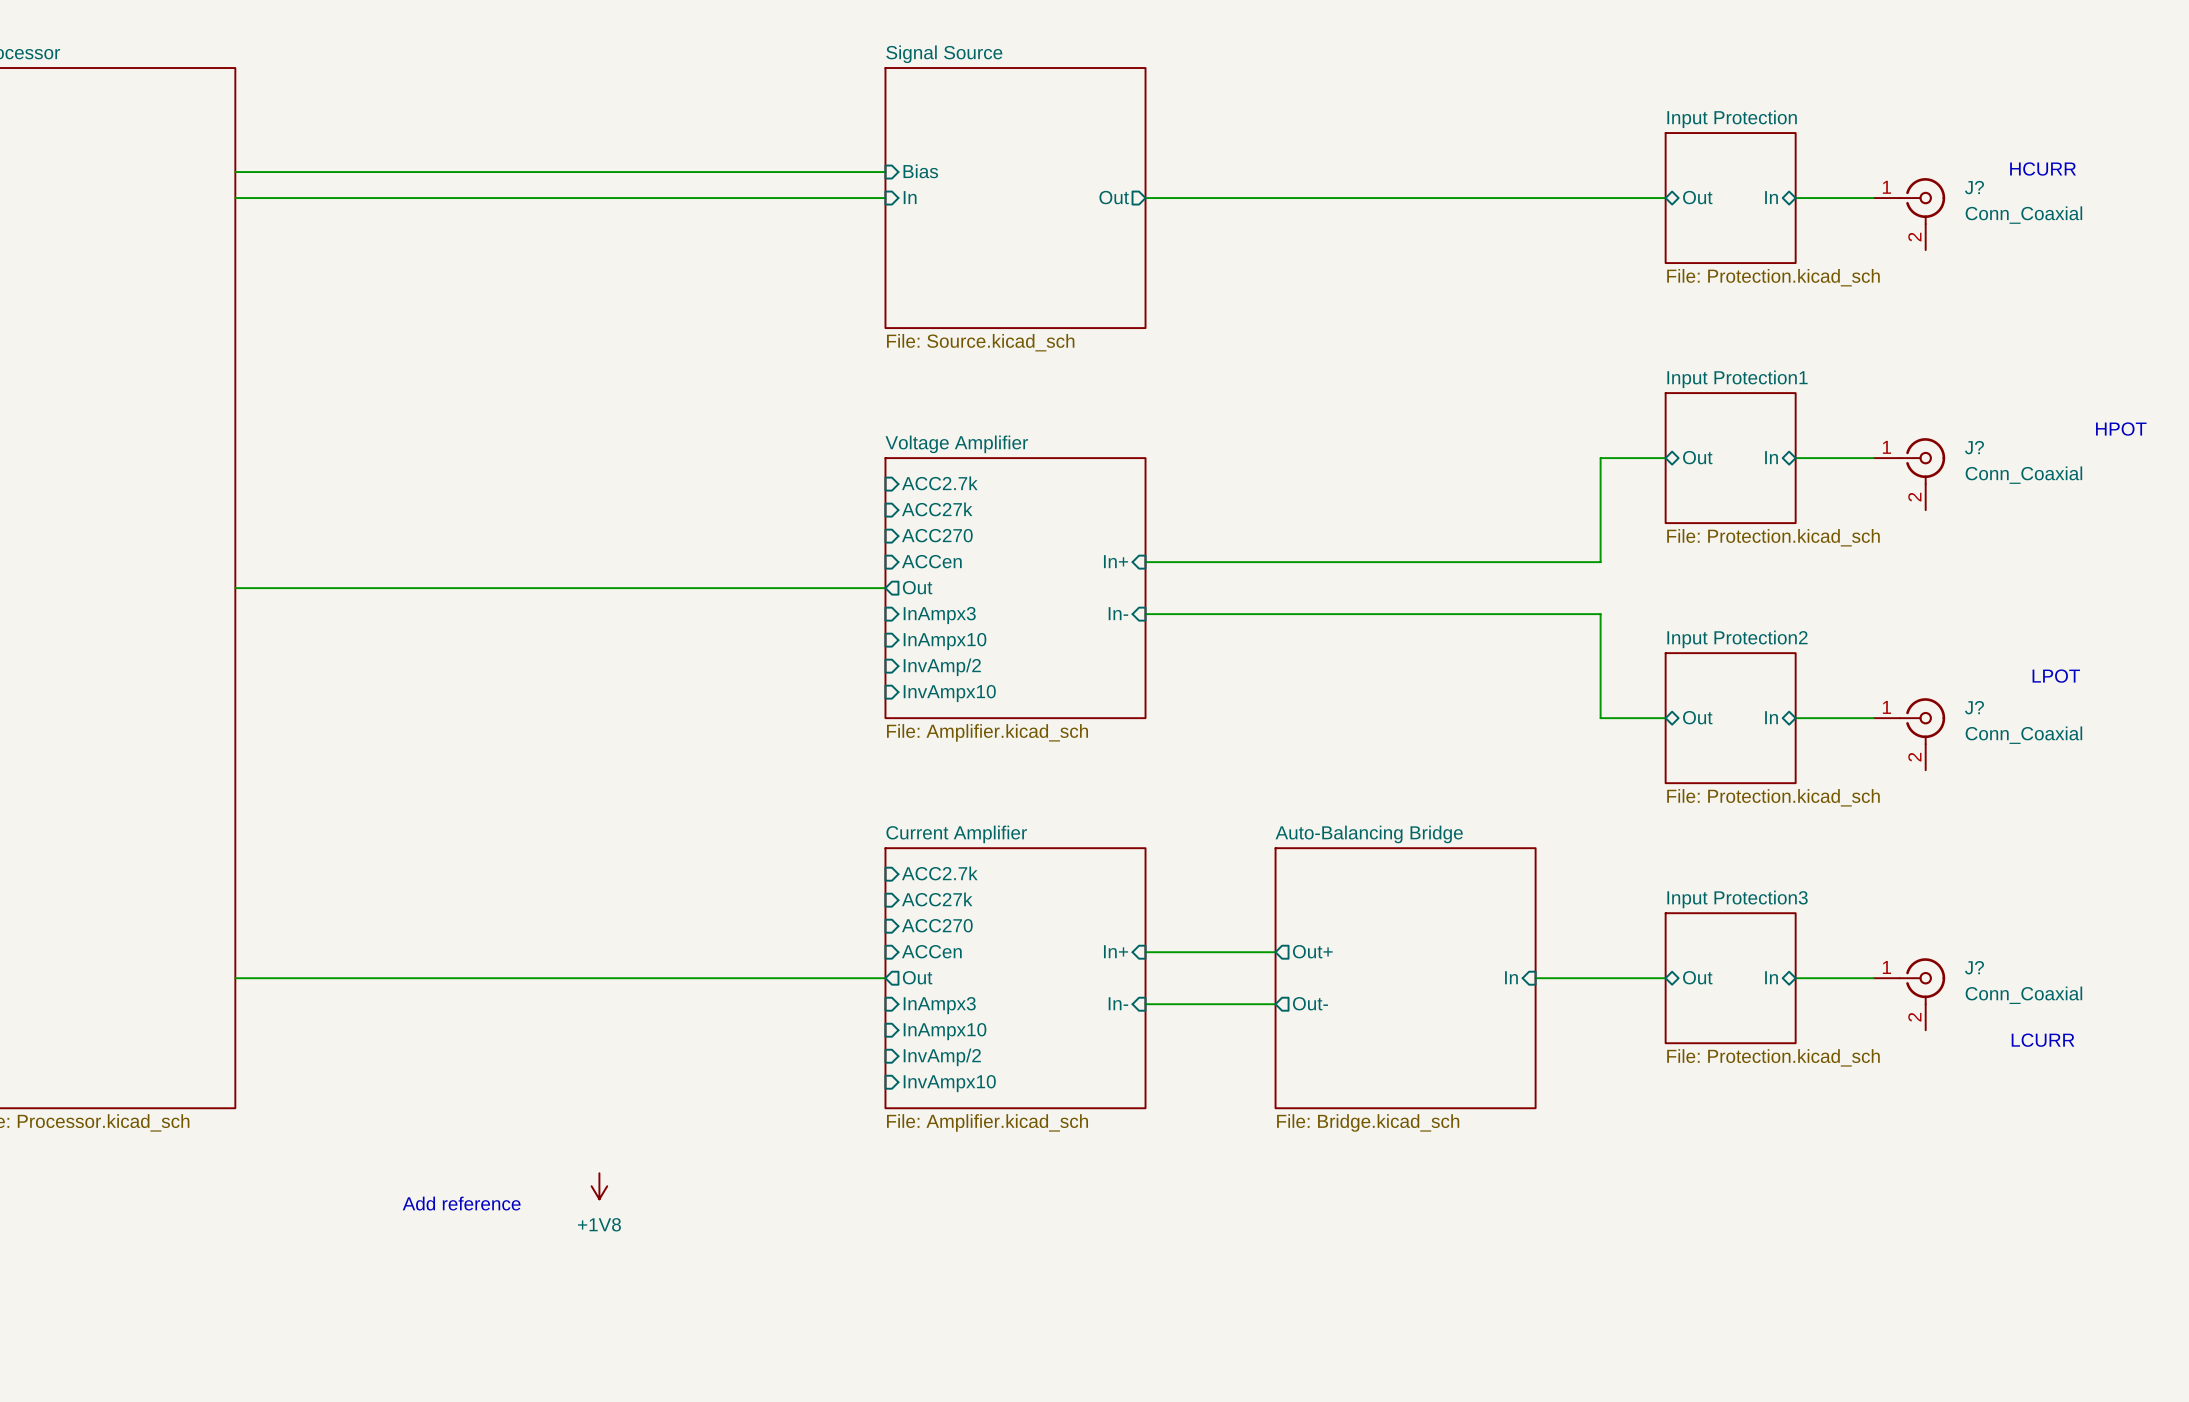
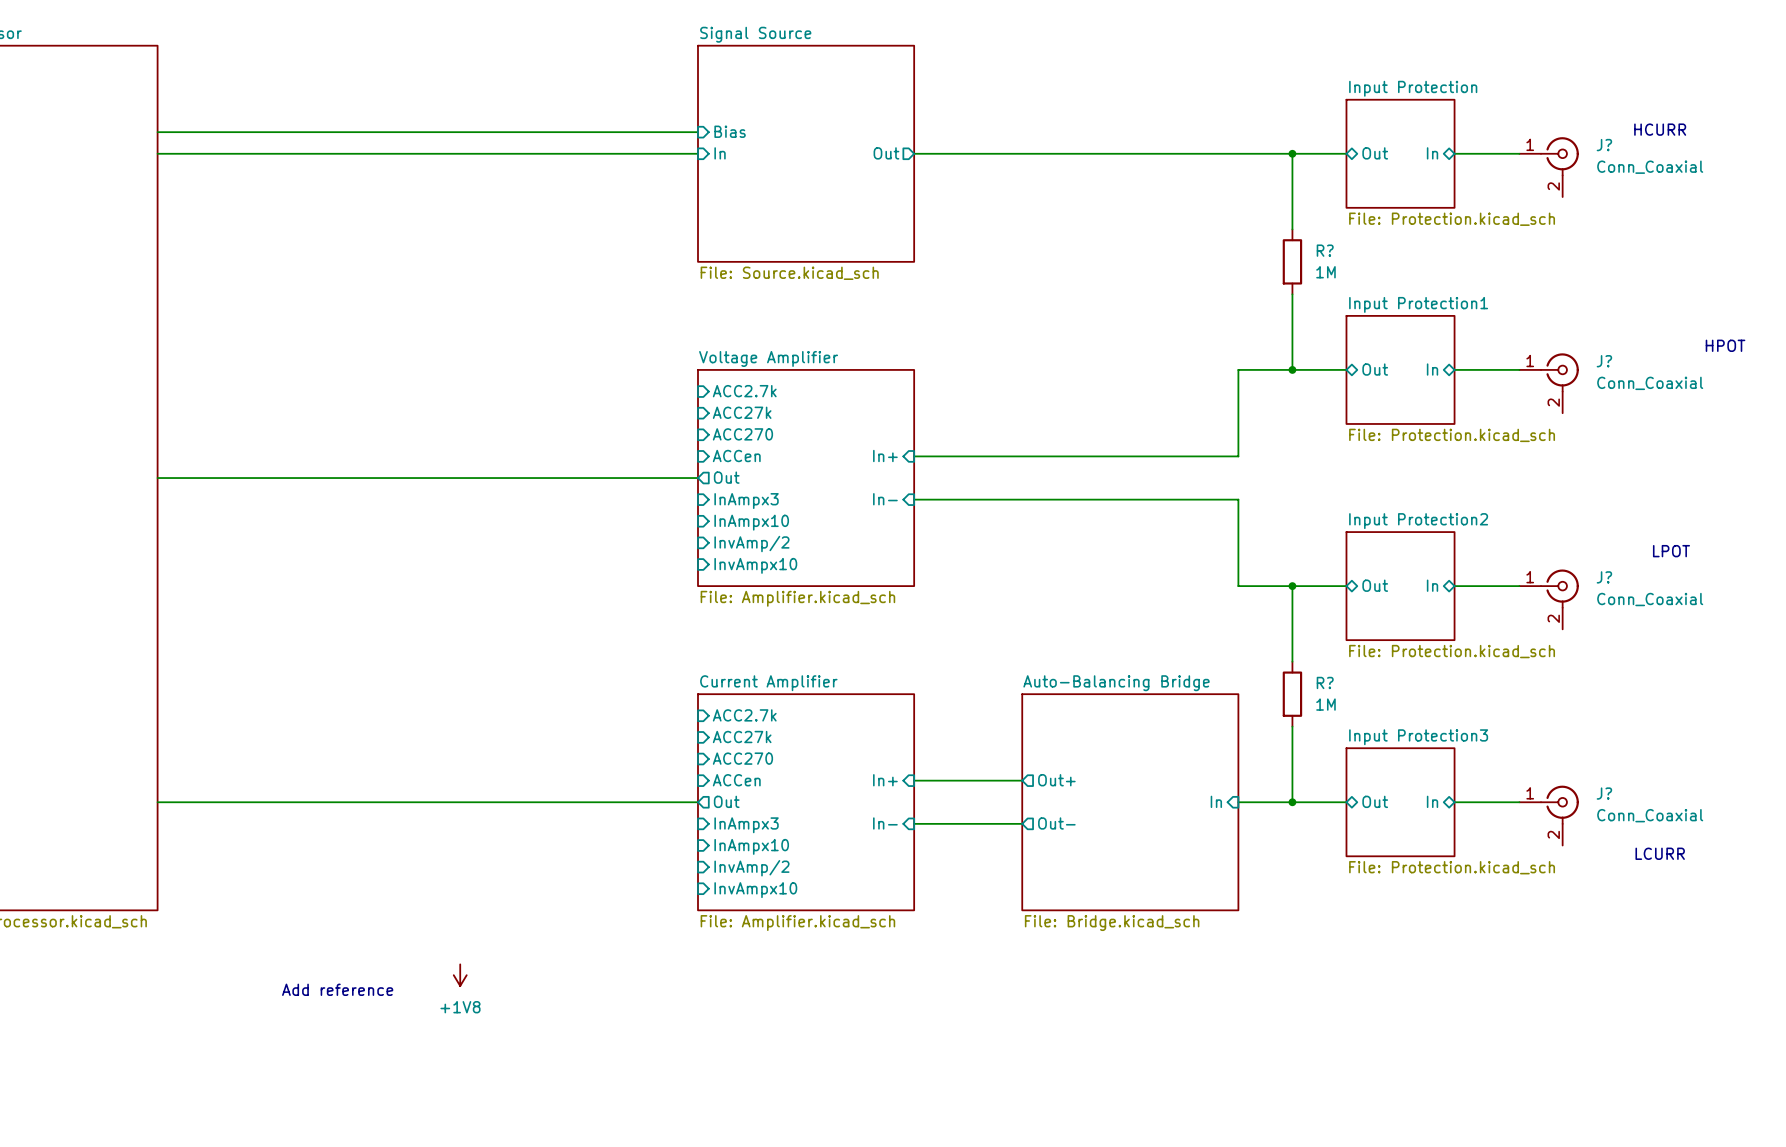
wire: none -> (1292, 153) (1292, 229)
junction: none -> (1292, 153)
R?: none -> 1M (1292, 261)
wire: (1600, 458) (1600, 562) (1535, 562) -> (1292, 294) (1292, 369) (1238, 369) (1238, 456)
junction: none -> (1292, 369)
wire: (1535, 614) (1600, 614) (1600, 718) -> (1238, 499) (1238, 586) (1292, 586) (1292, 661)
junction: none -> (1292, 586)
R?: none -> 1M (1292, 694)
wire: none -> (1292, 726) (1292, 802)
junction: none -> (1292, 802)

